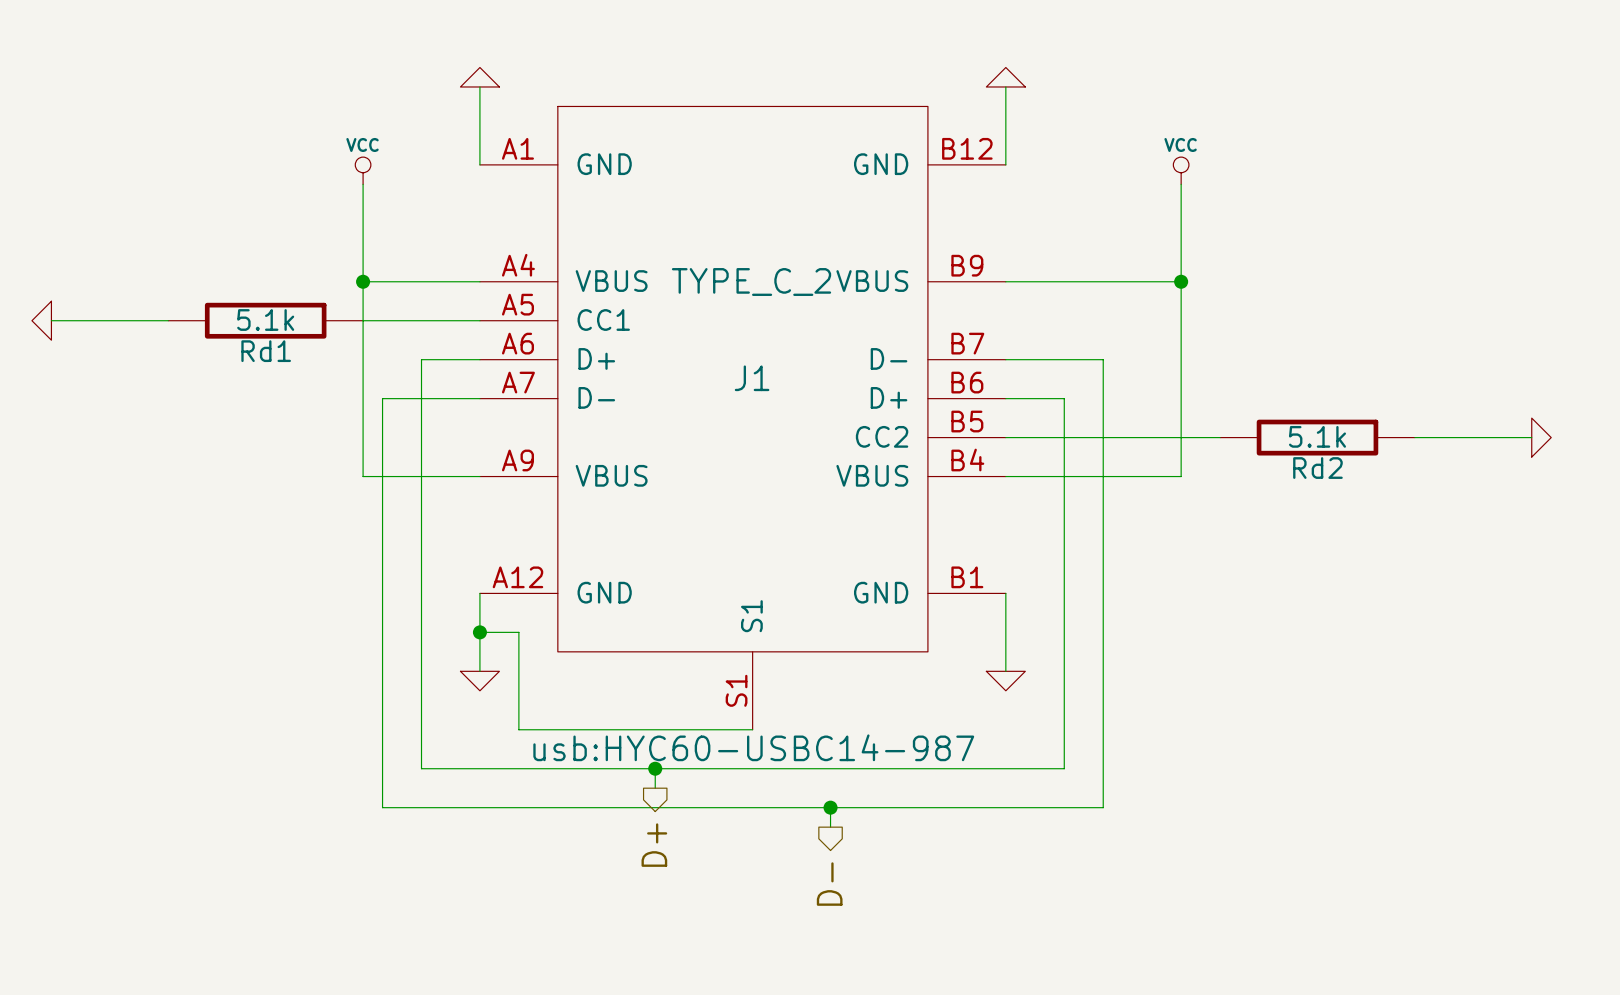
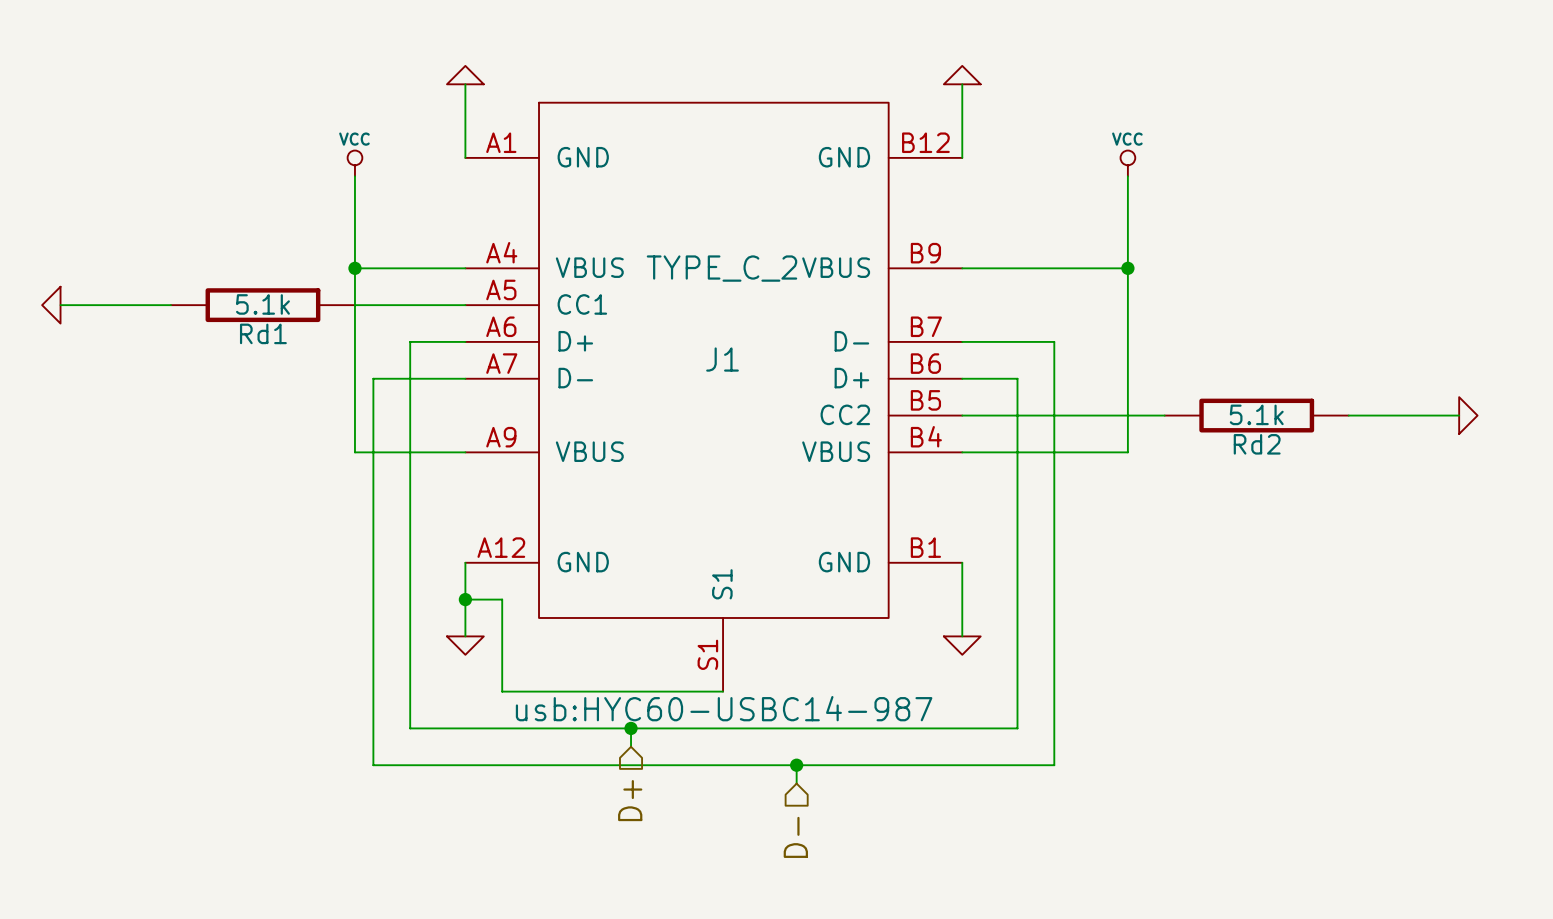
hierarchical label shape: output (654, 845) -> input (630, 800)
hierarchical label shape: output (829, 884) -> input (795, 837)

